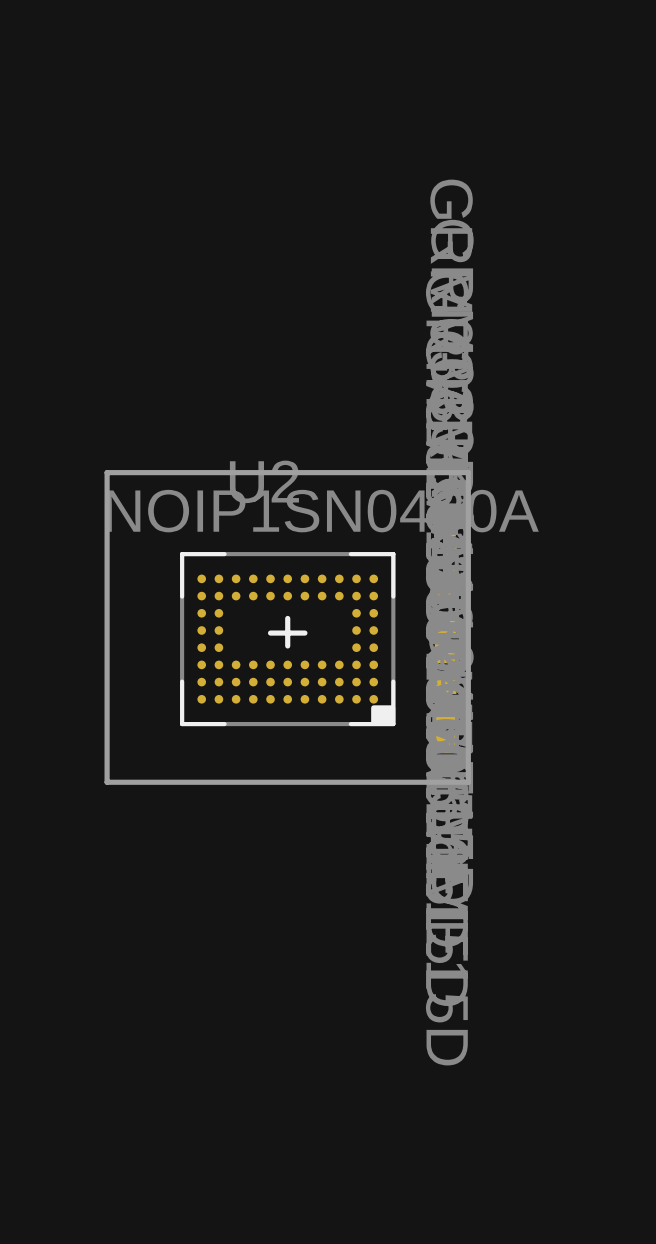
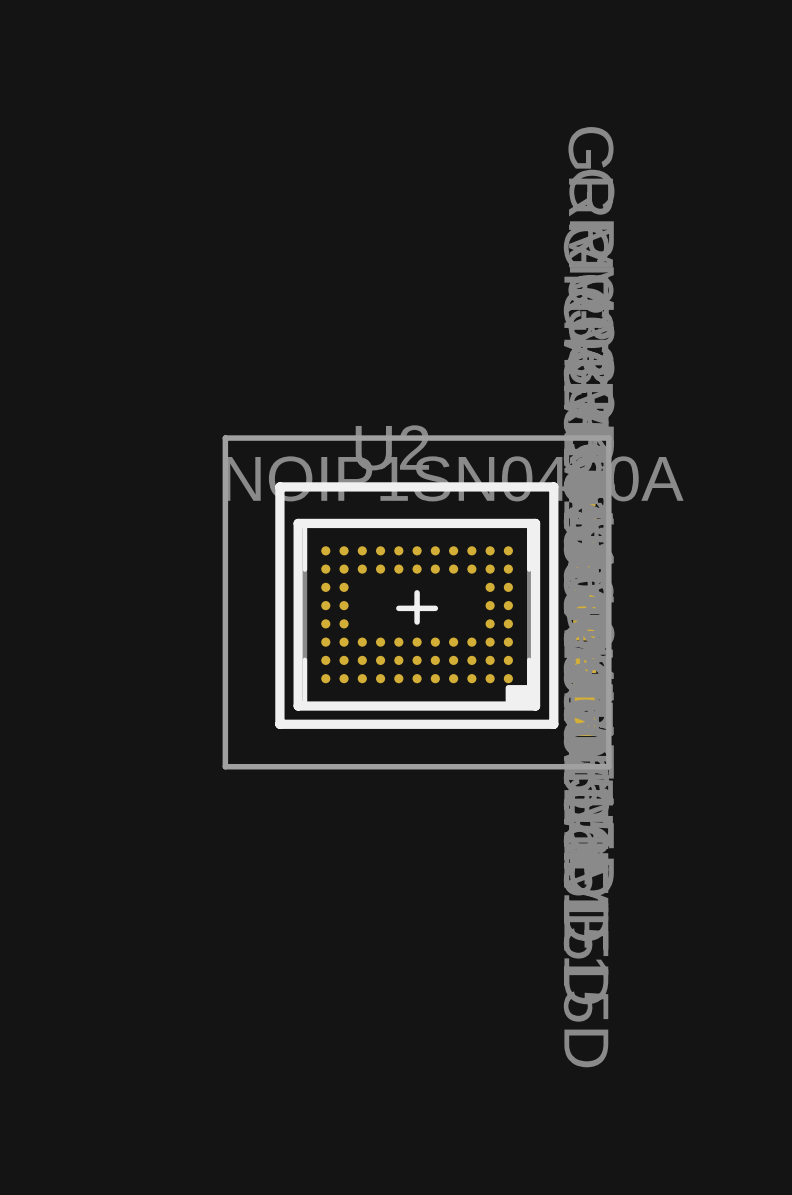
line: none -> (553, 486) (279, 486) (279, 724) (553, 724) (553, 486)
line: none -> (535, 523) (535, 706) (298, 706) (298, 523) (535, 523)

